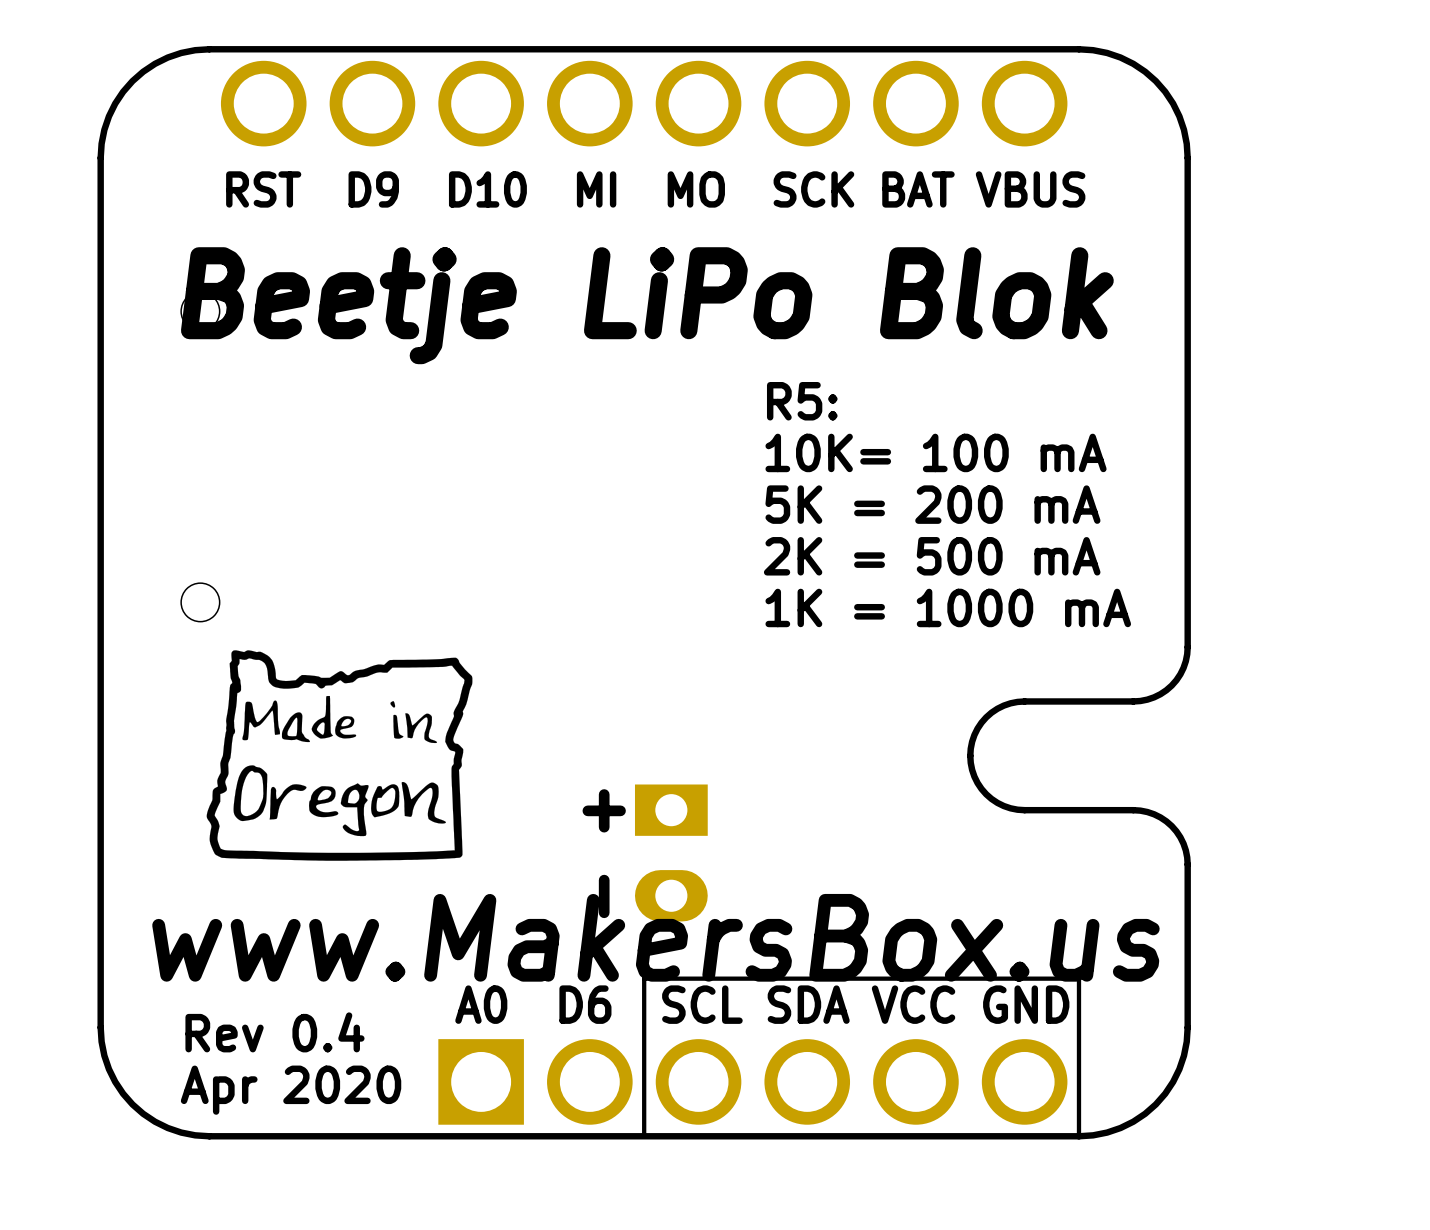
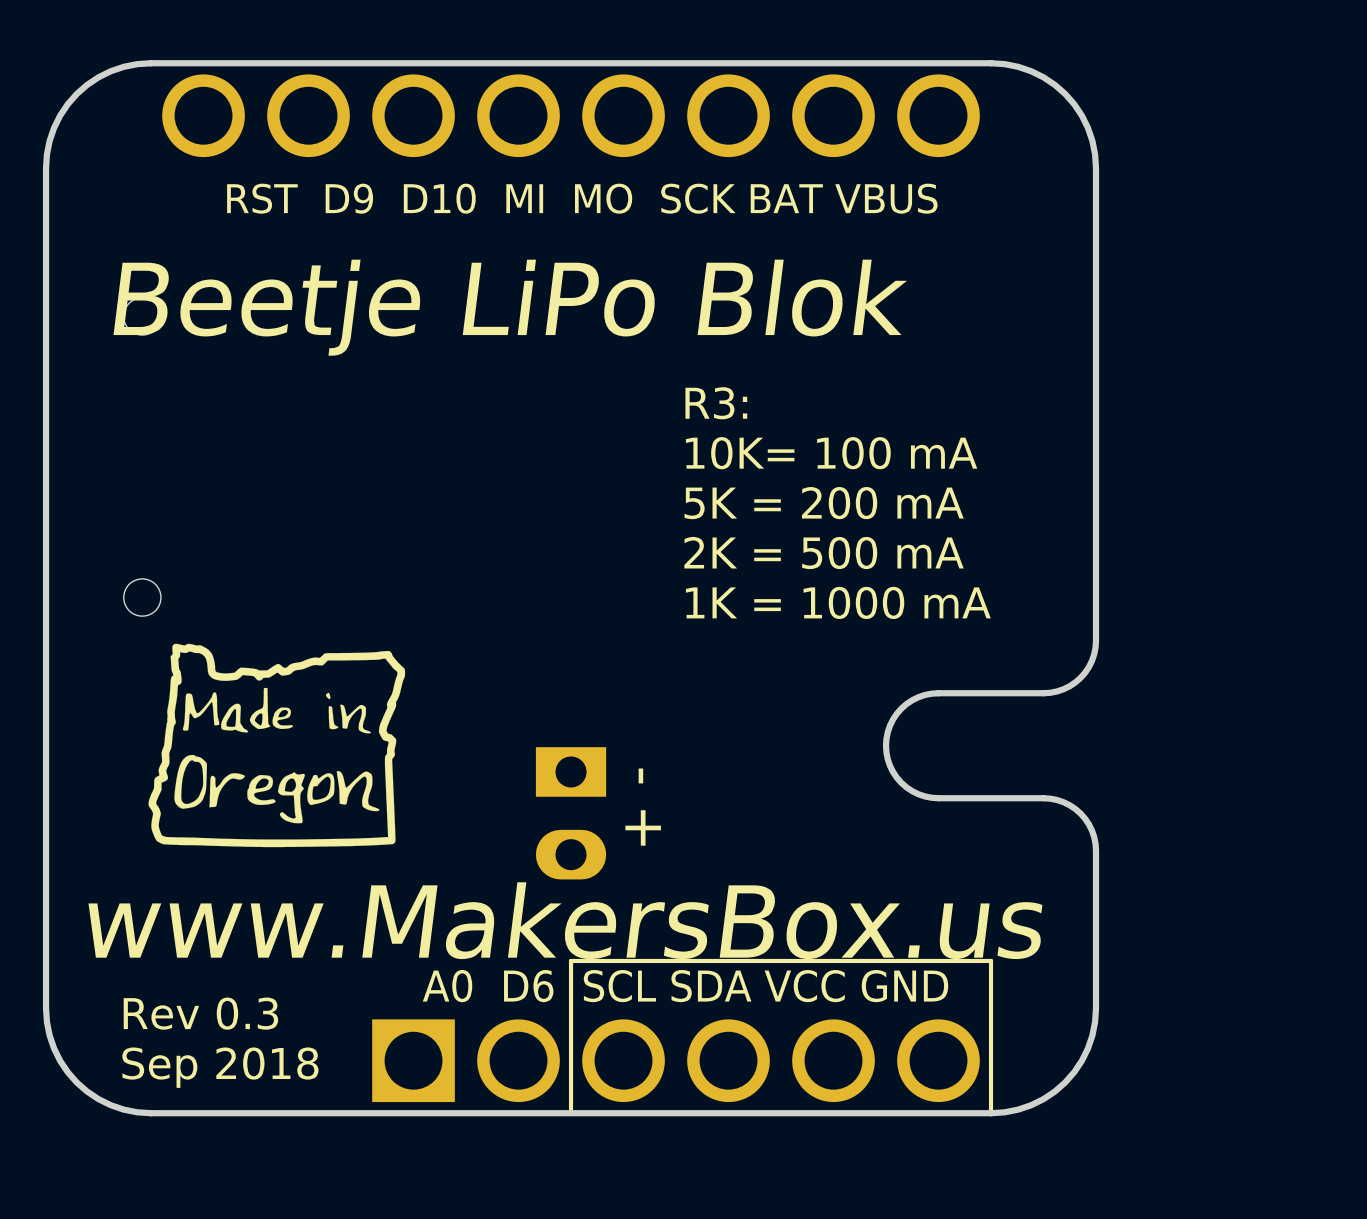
text: R5: (802, 401) -> R3: (716, 403)
part position: (671, 852) -> (571, 813)
text rotation: 0° (604, 853) -> 180° (643, 807)
text: Rev 0.4 (274, 1032) -> Rev 0.3 (200, 1013)
text: Apr 2020 (291, 1090) -> Sep 2018 (220, 1067)

